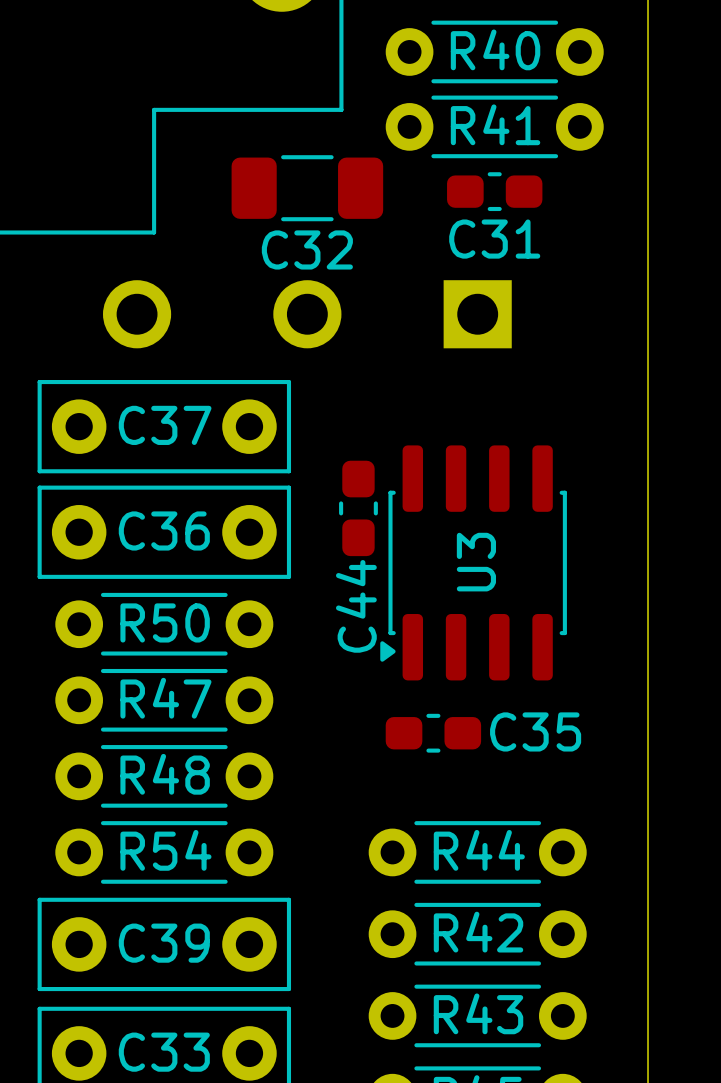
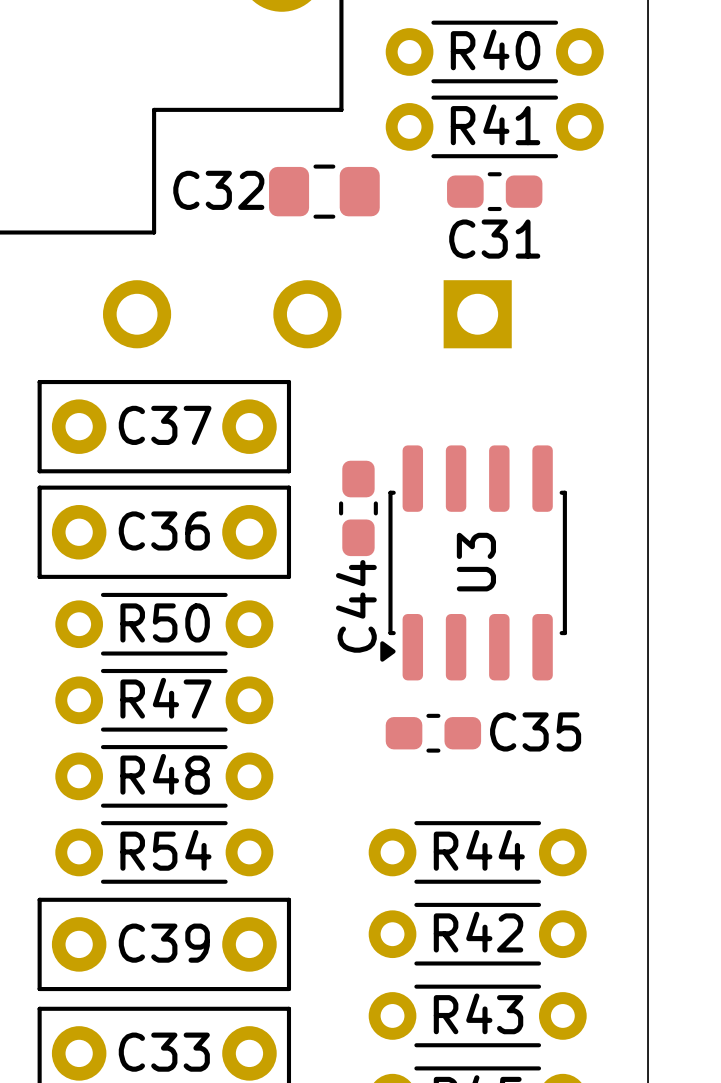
C32 footprint: [231, 155, 384, 222] -> [269, 164, 380, 219]
C32 name position: C32 (307, 249) -> C32 (218, 190)

